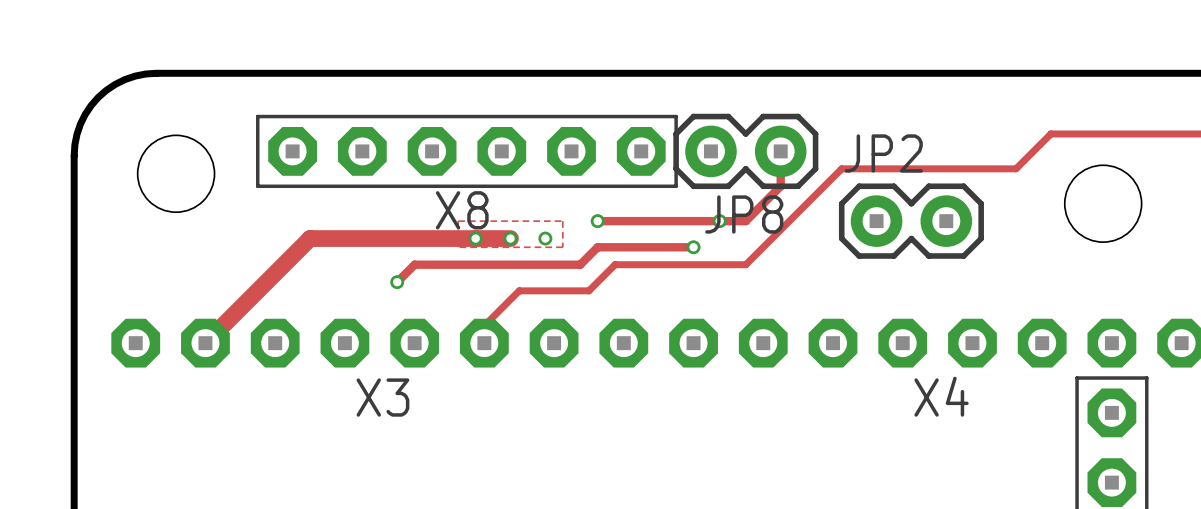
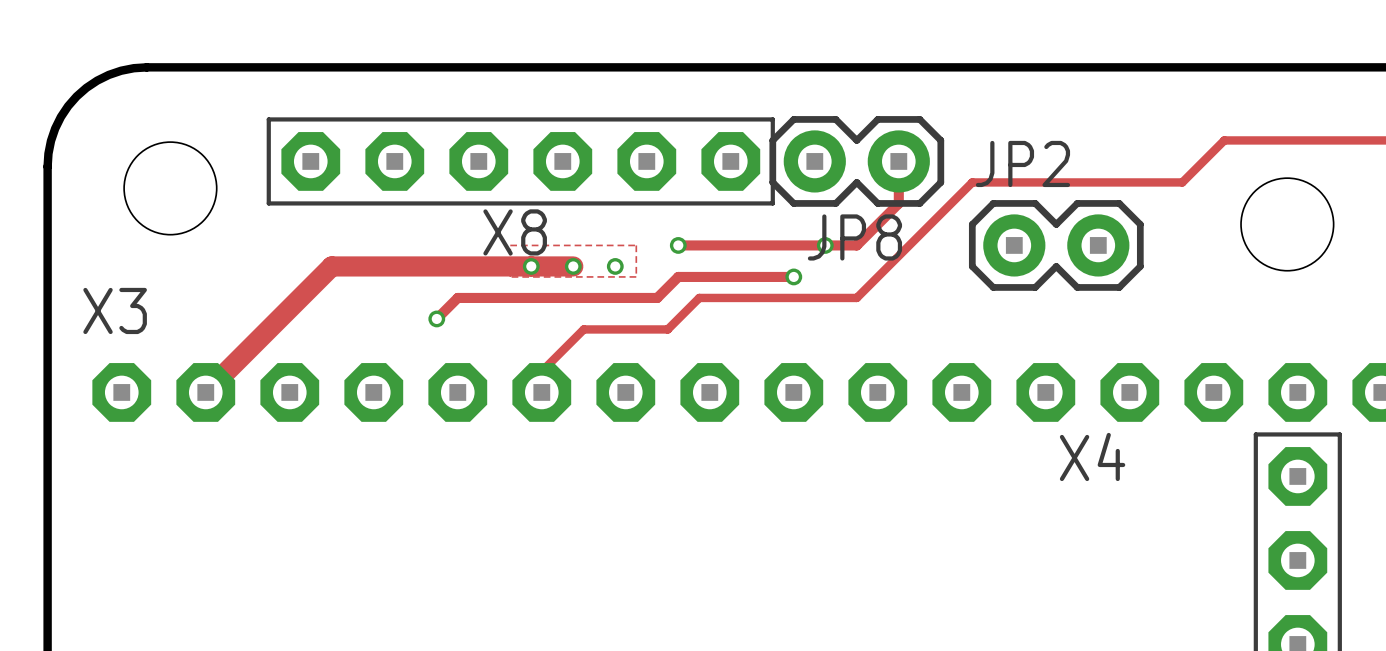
X3 name position: X3 (382, 397) -> X3 (115, 310)

